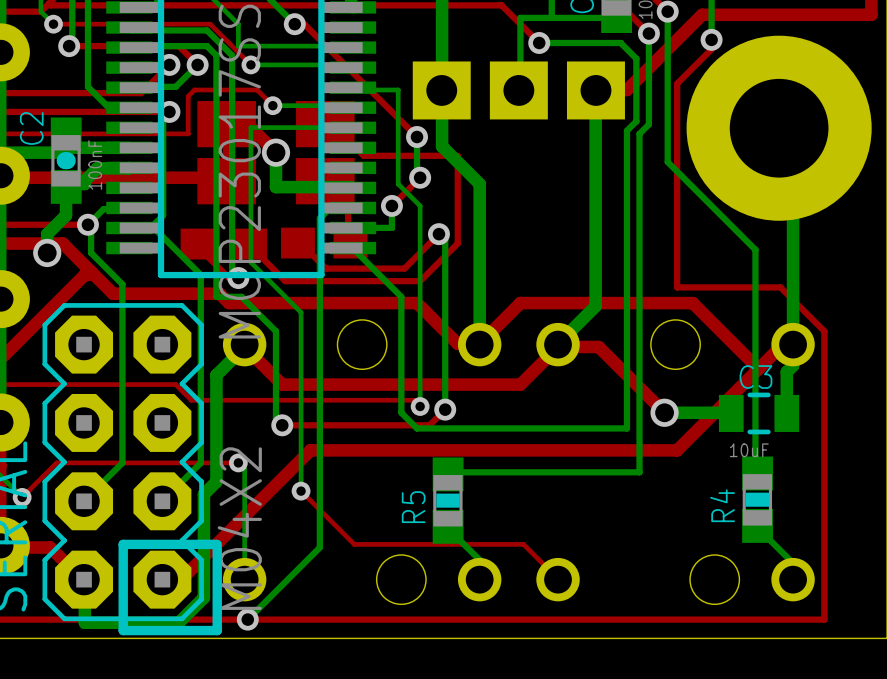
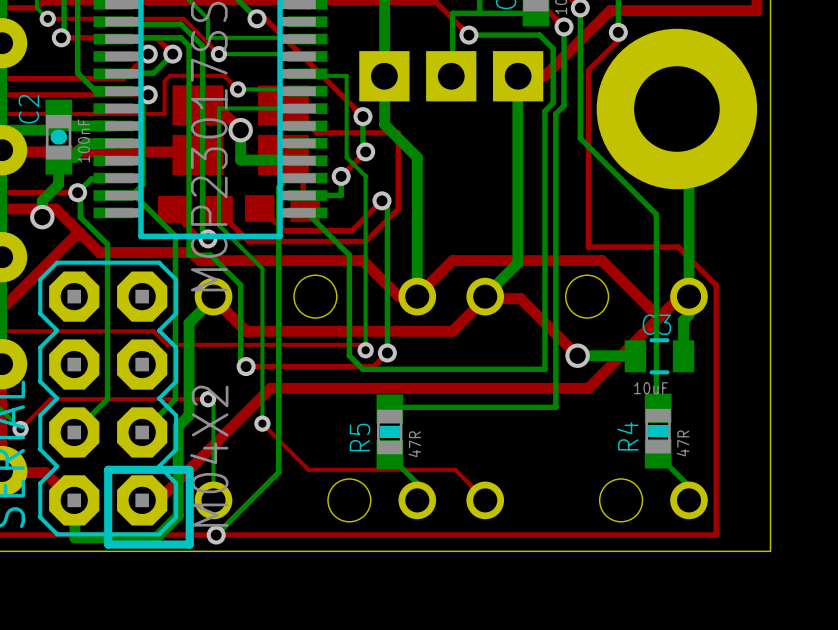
R4 value: none -> 47R (683, 443)
R5 value: none -> 47R (414, 444)

